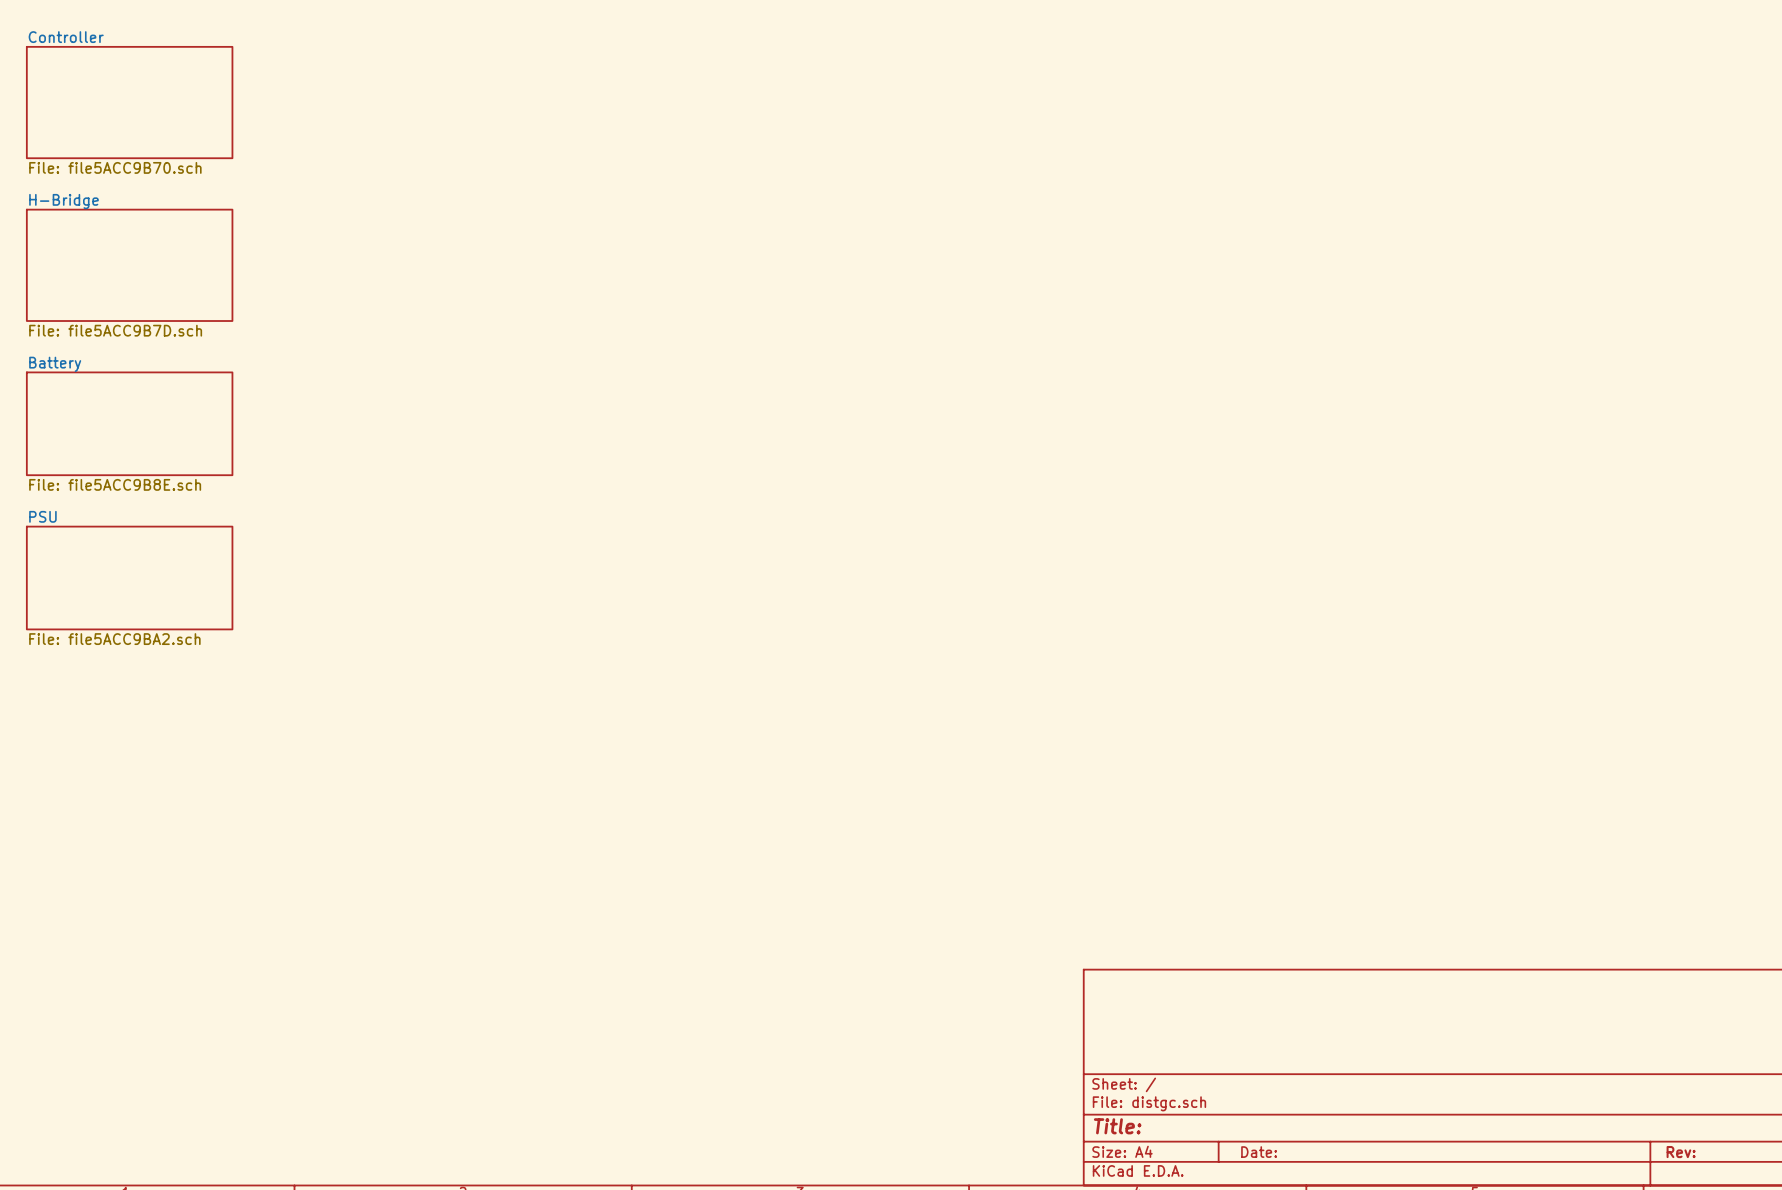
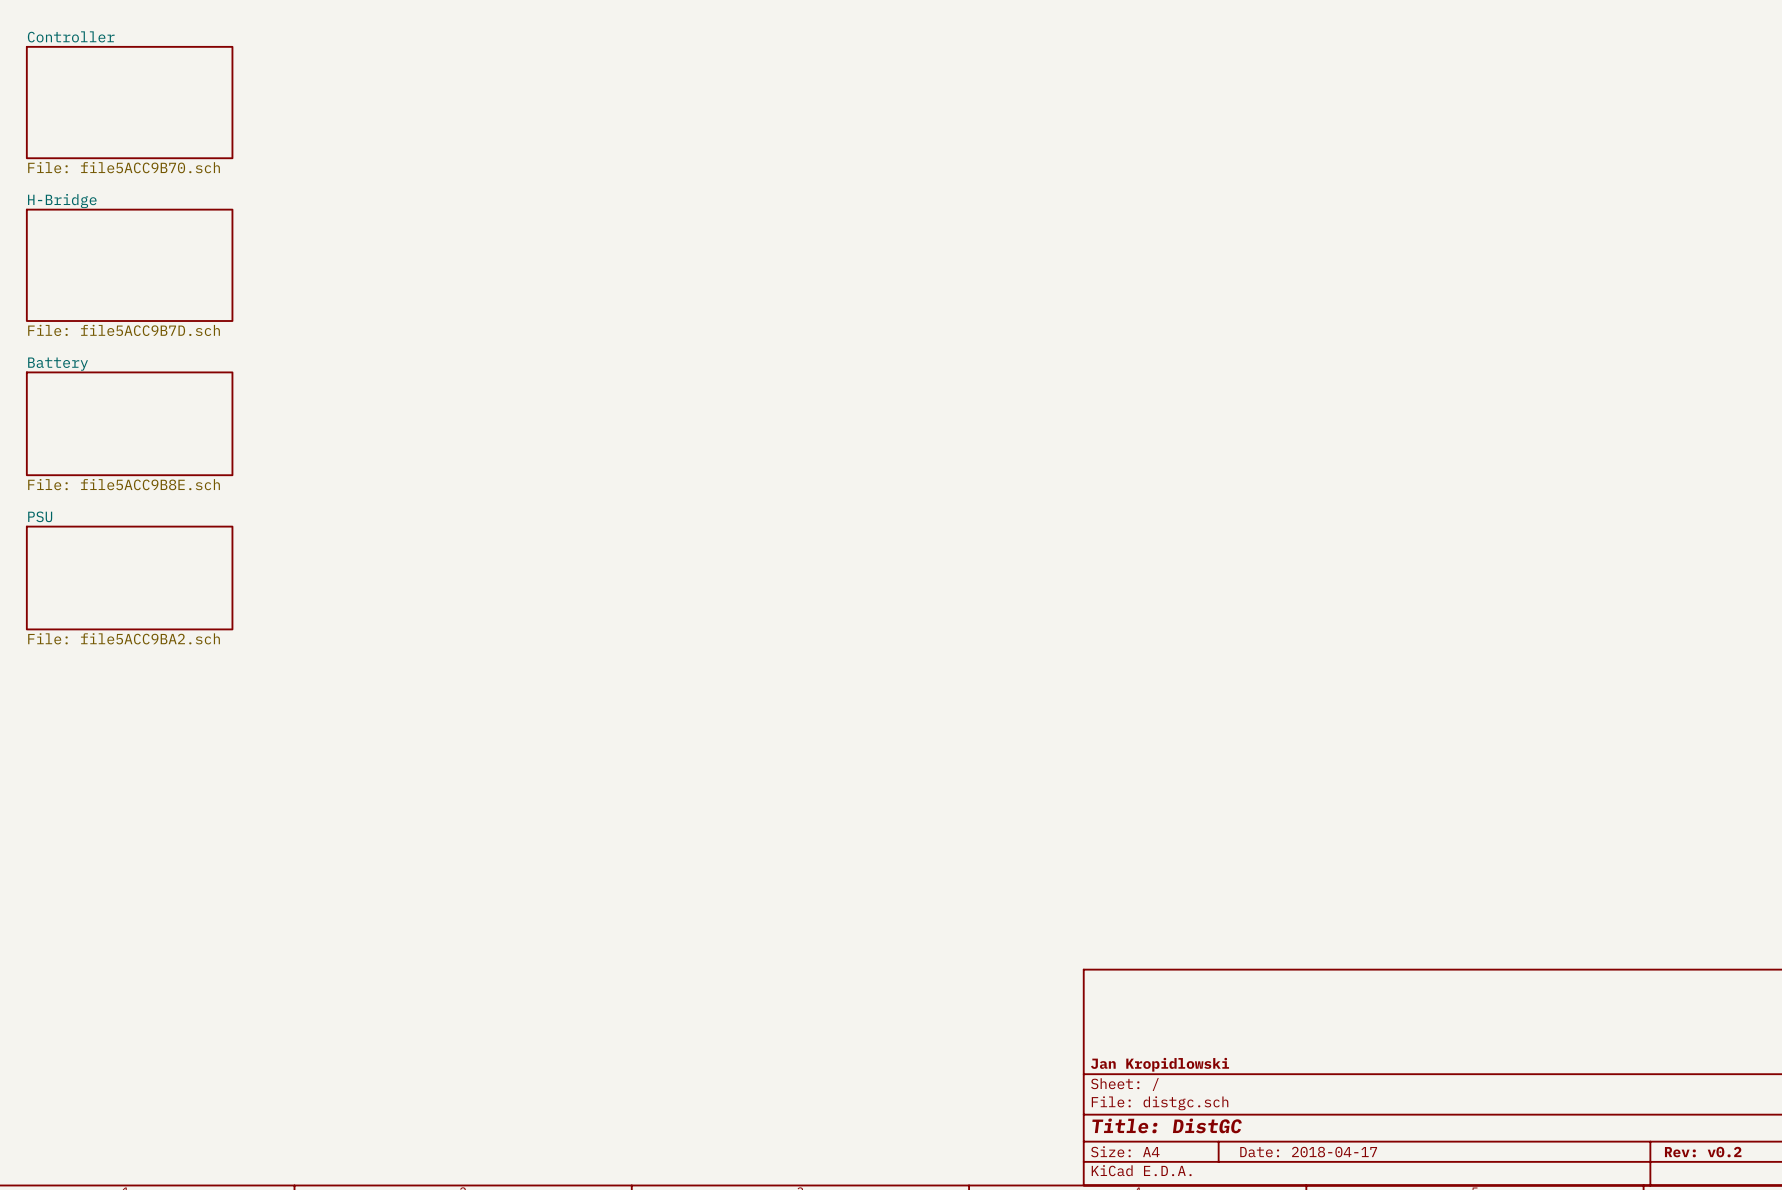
title block: none -> Jan Kropidlowski (1160, 1064)
title block: Title: (1117, 1126) -> Title: DistGC (1167, 1125)
title block: Date: (1259, 1152) -> Date: 2018-04-17 (1308, 1152)
title block: Rev: (1681, 1152) -> Rev: v0.2 (1703, 1152)

